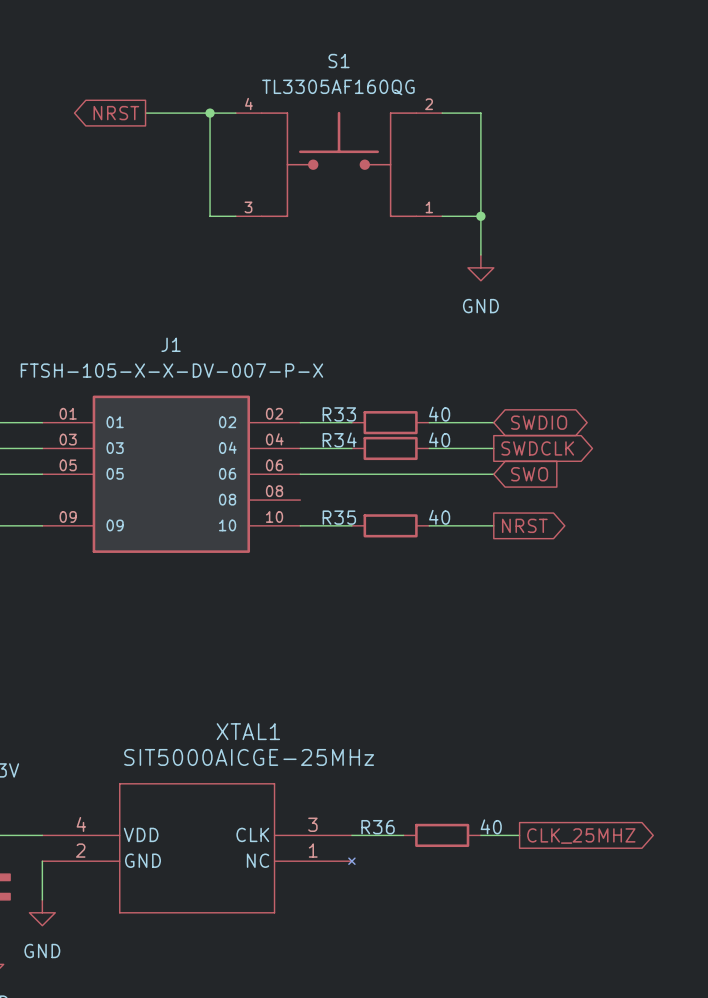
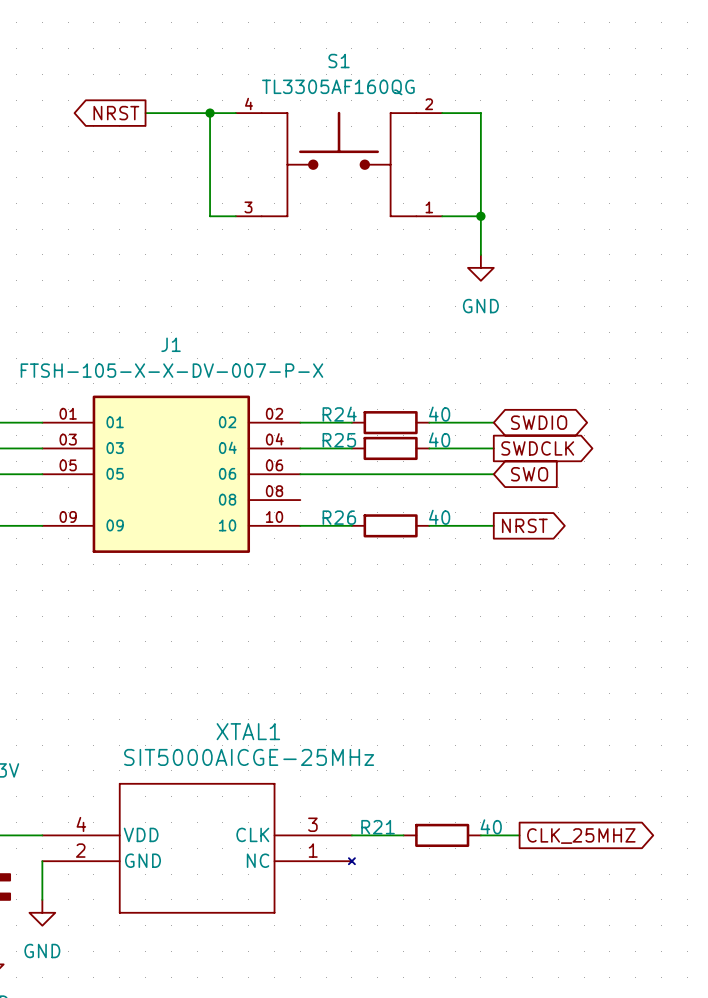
R33 name: R33 (339, 414) -> R24 (339, 414)
R34 name: R34 (339, 439) -> R25 (339, 440)
R35 name: R35 (339, 517) -> R26 (339, 517)
R36 name: R36 (378, 827) -> R21 (378, 827)

